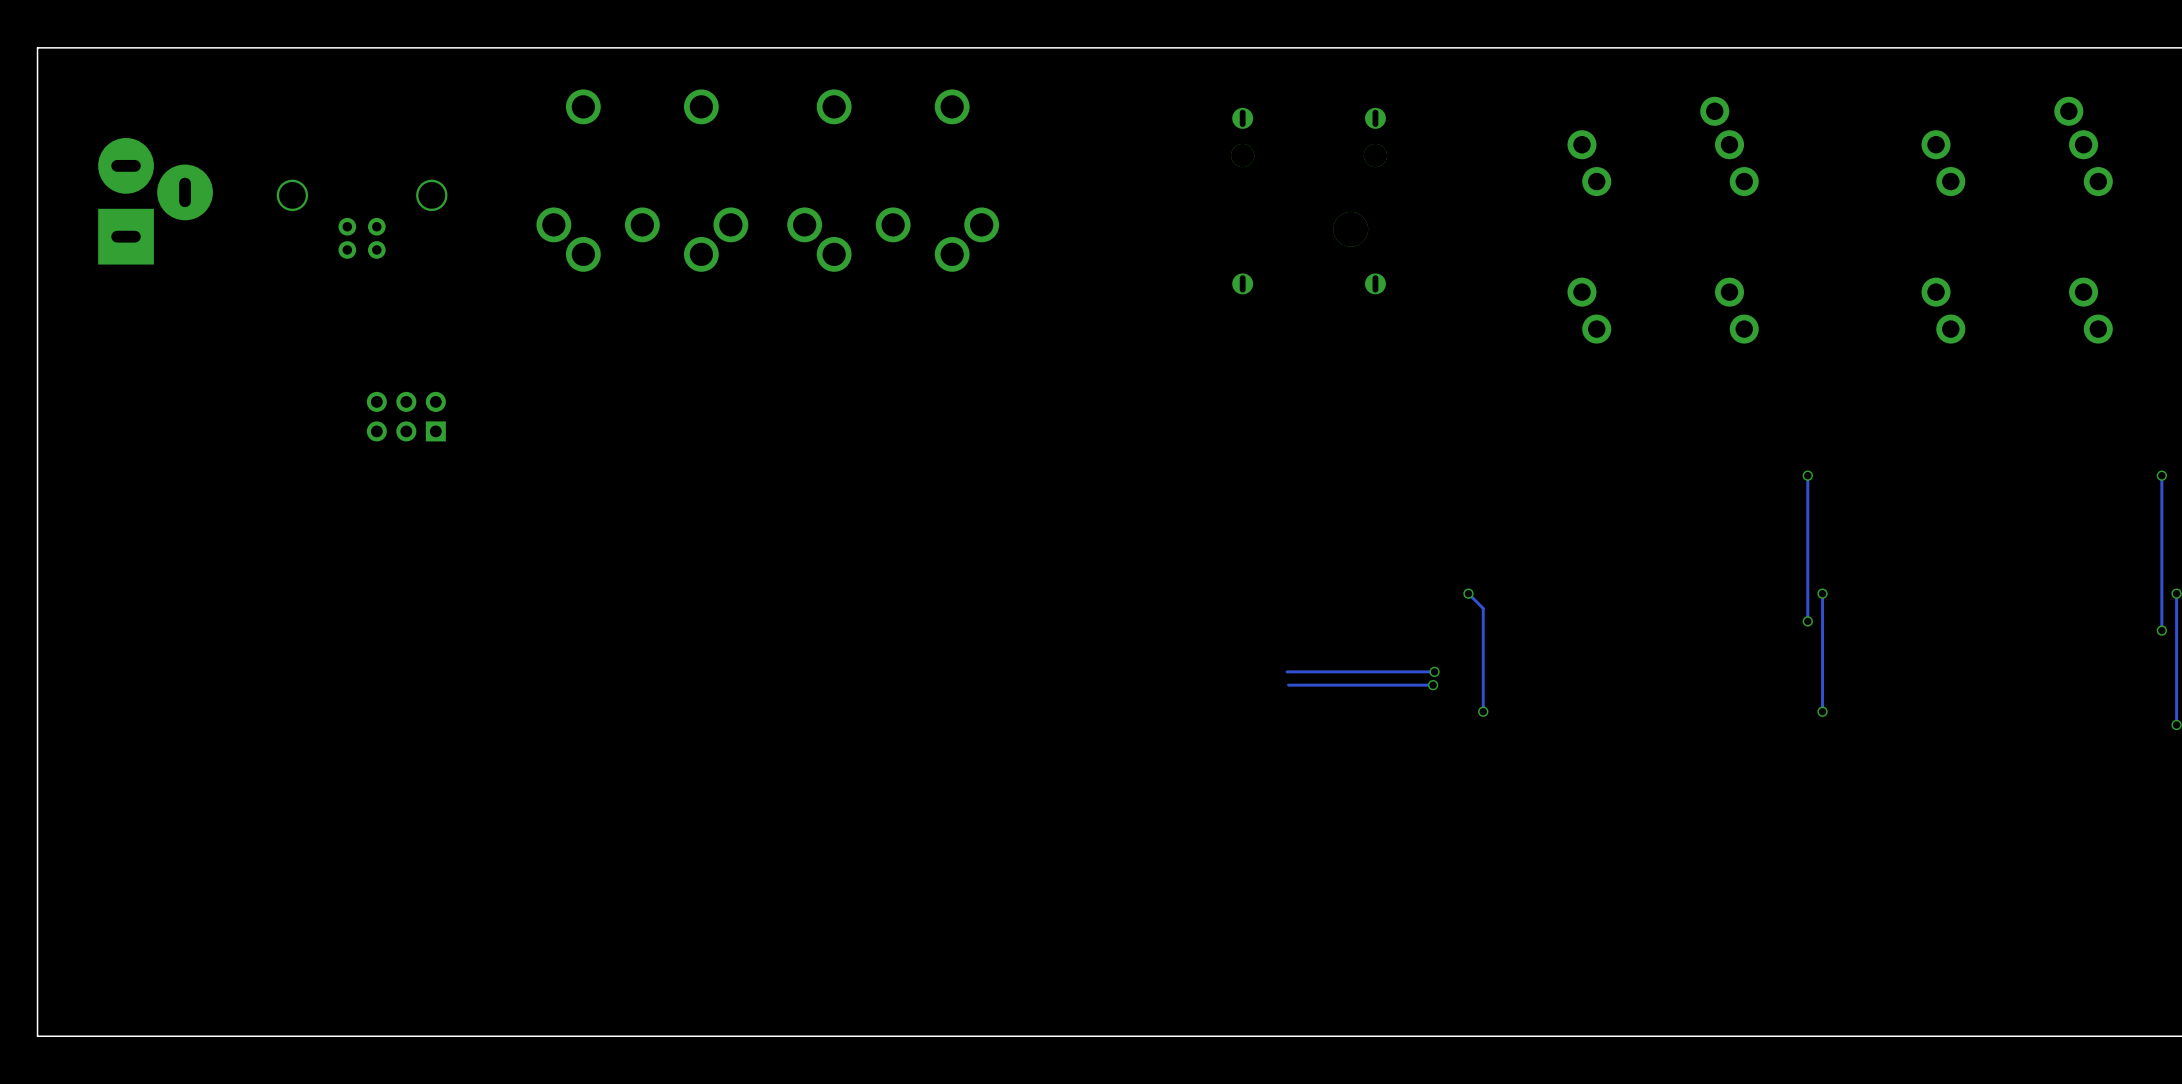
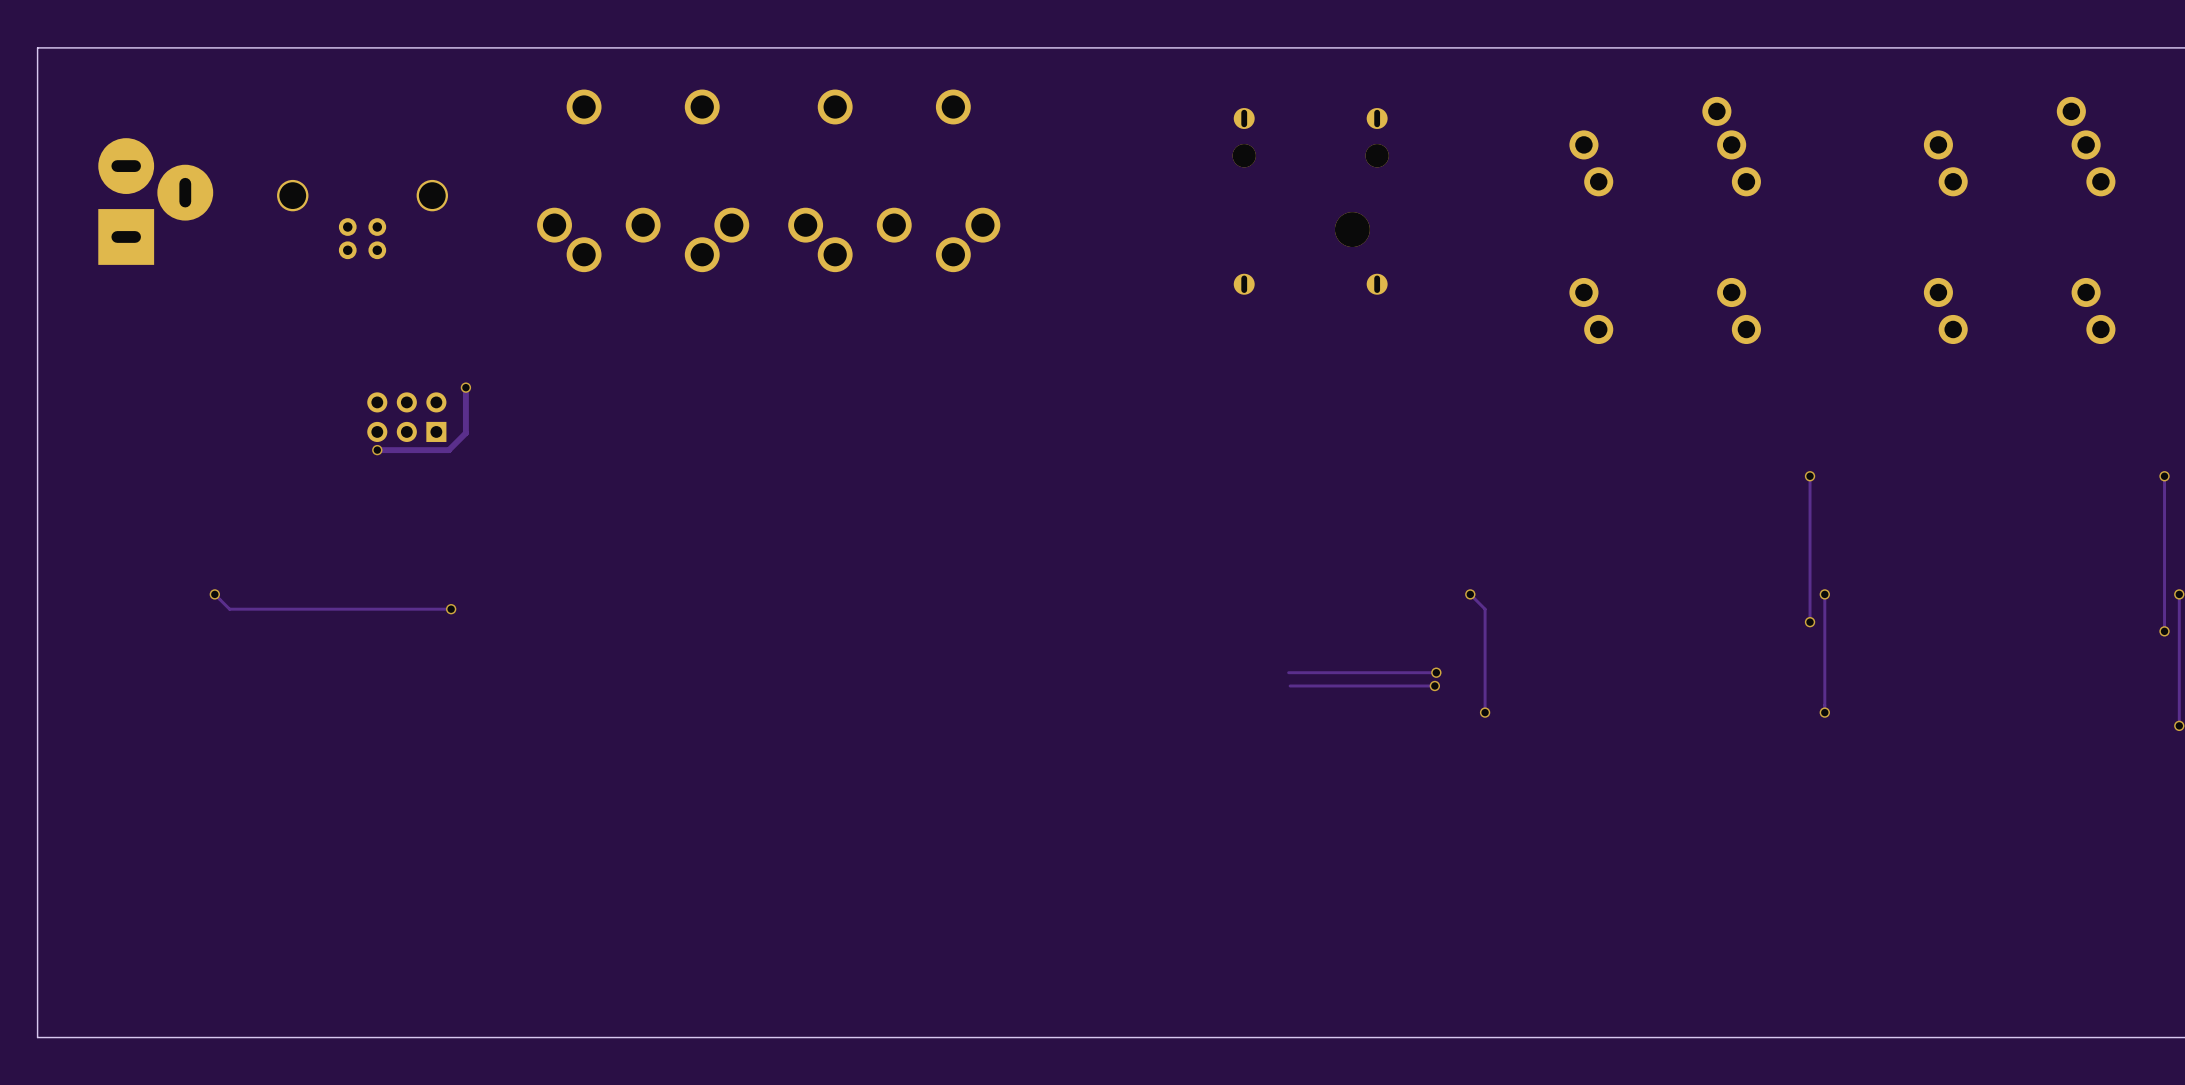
track: none -> (465, 387) (465, 433) (448, 450) (377, 450)
via: none -> (465, 387)
via: none -> (377, 450)
track: none -> (214, 594) (229, 609) (451, 609)
via: none -> (214, 594)
via: none -> (451, 609)

